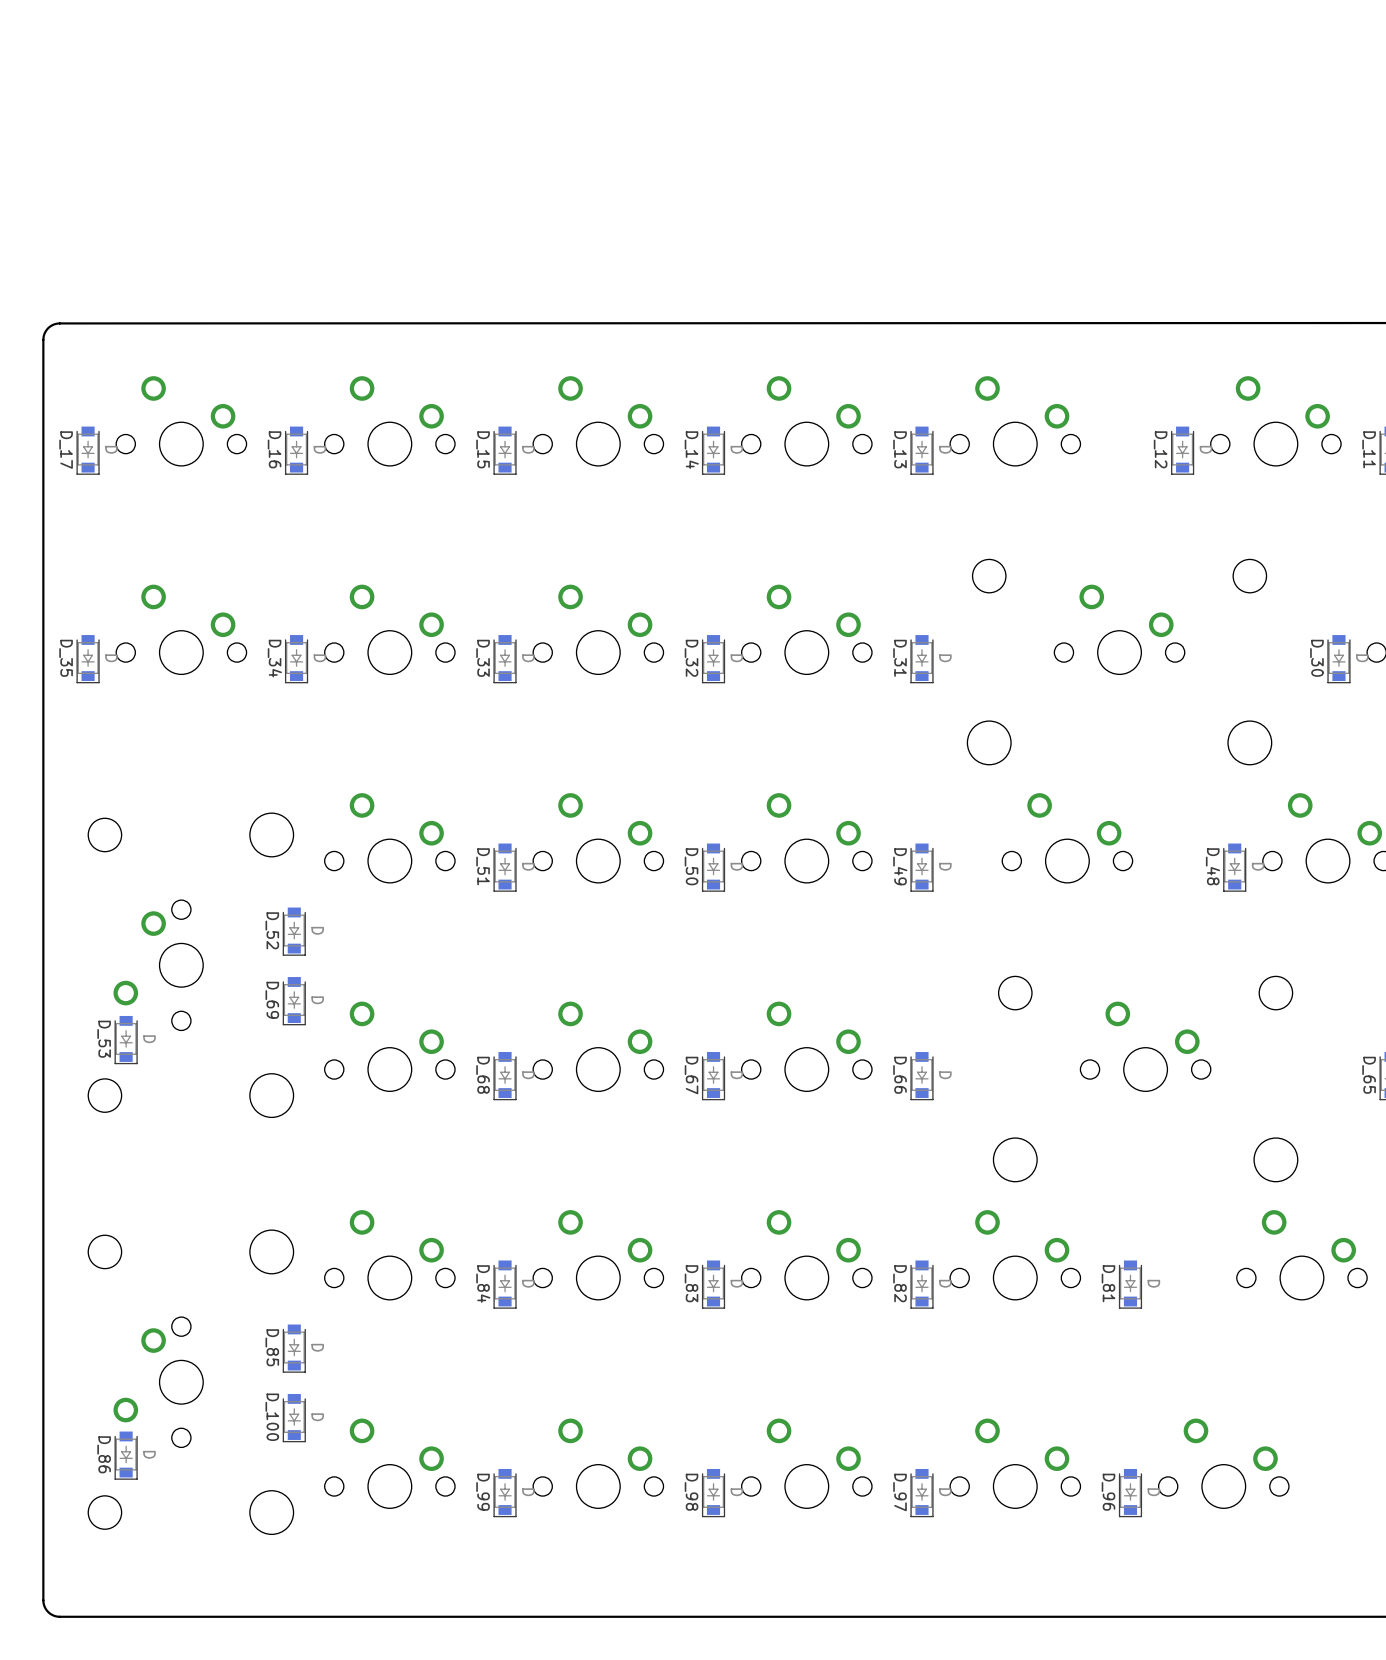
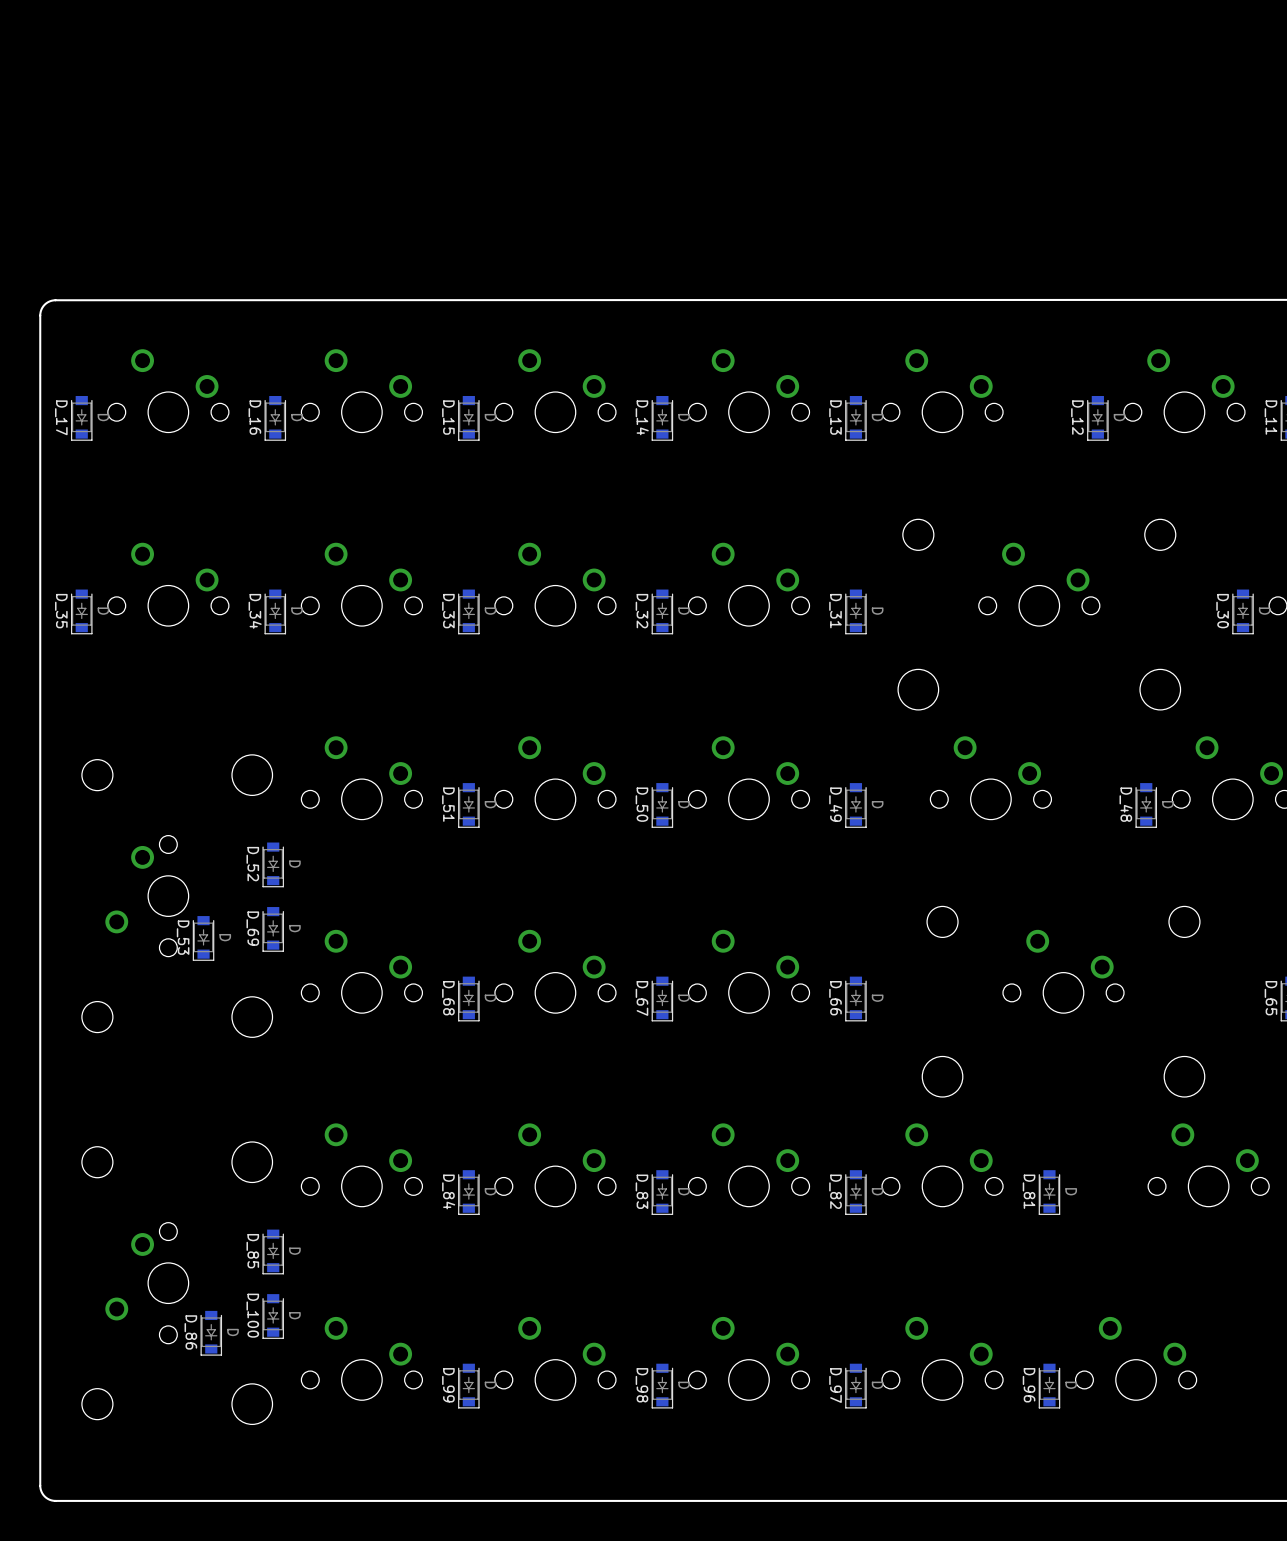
D_53 position: (126, 1040) -> (203, 938)
D_86 position: (126, 1455) -> (211, 1333)

